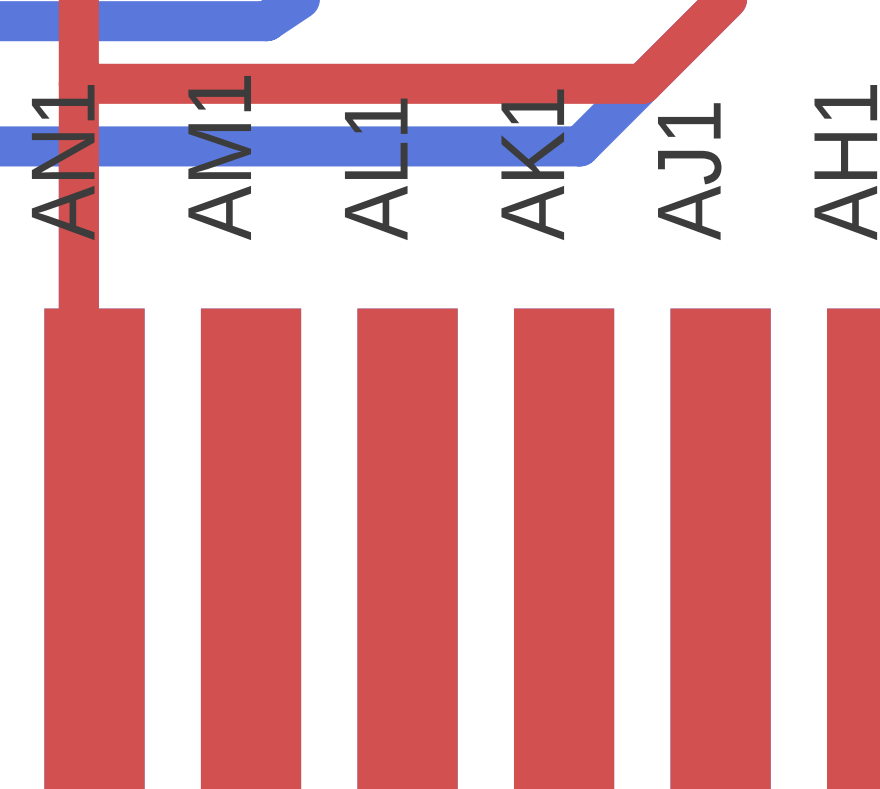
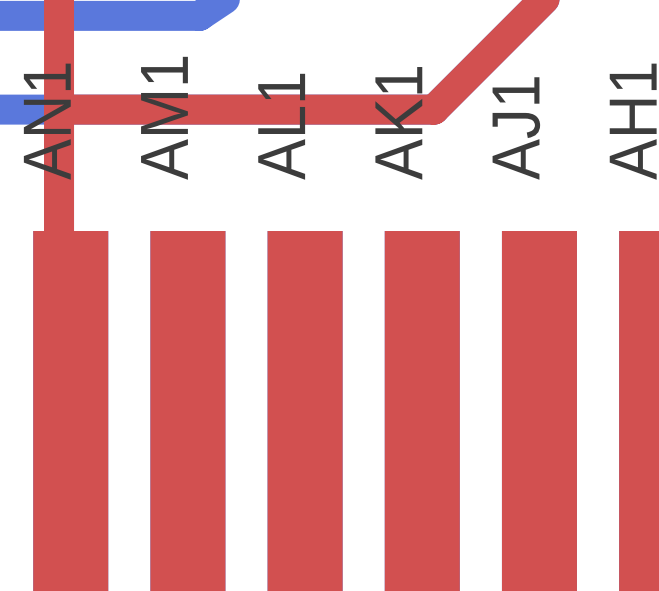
top track: (78, 83) (642, 83) -> (59, 109) (433, 109) (480, 62)

